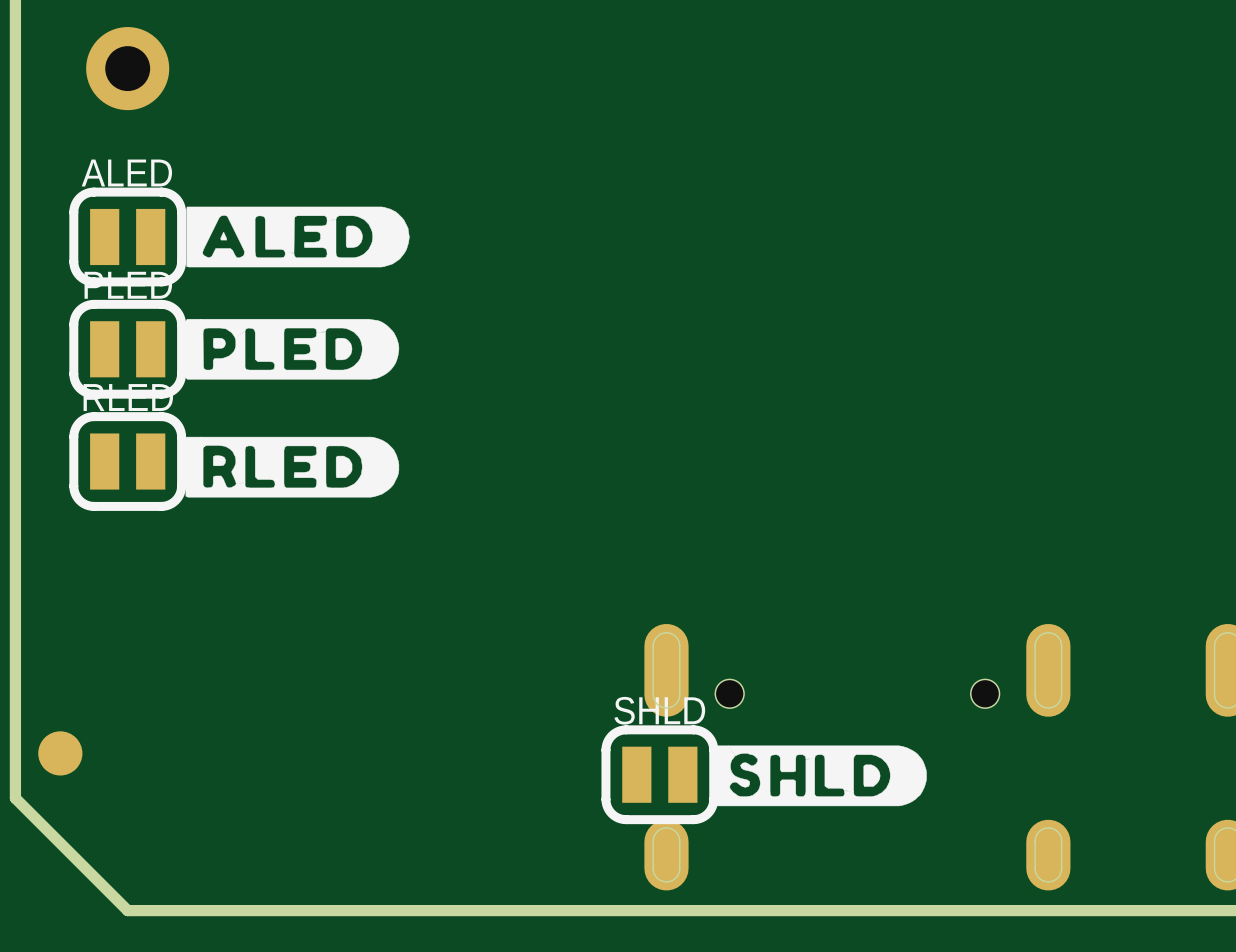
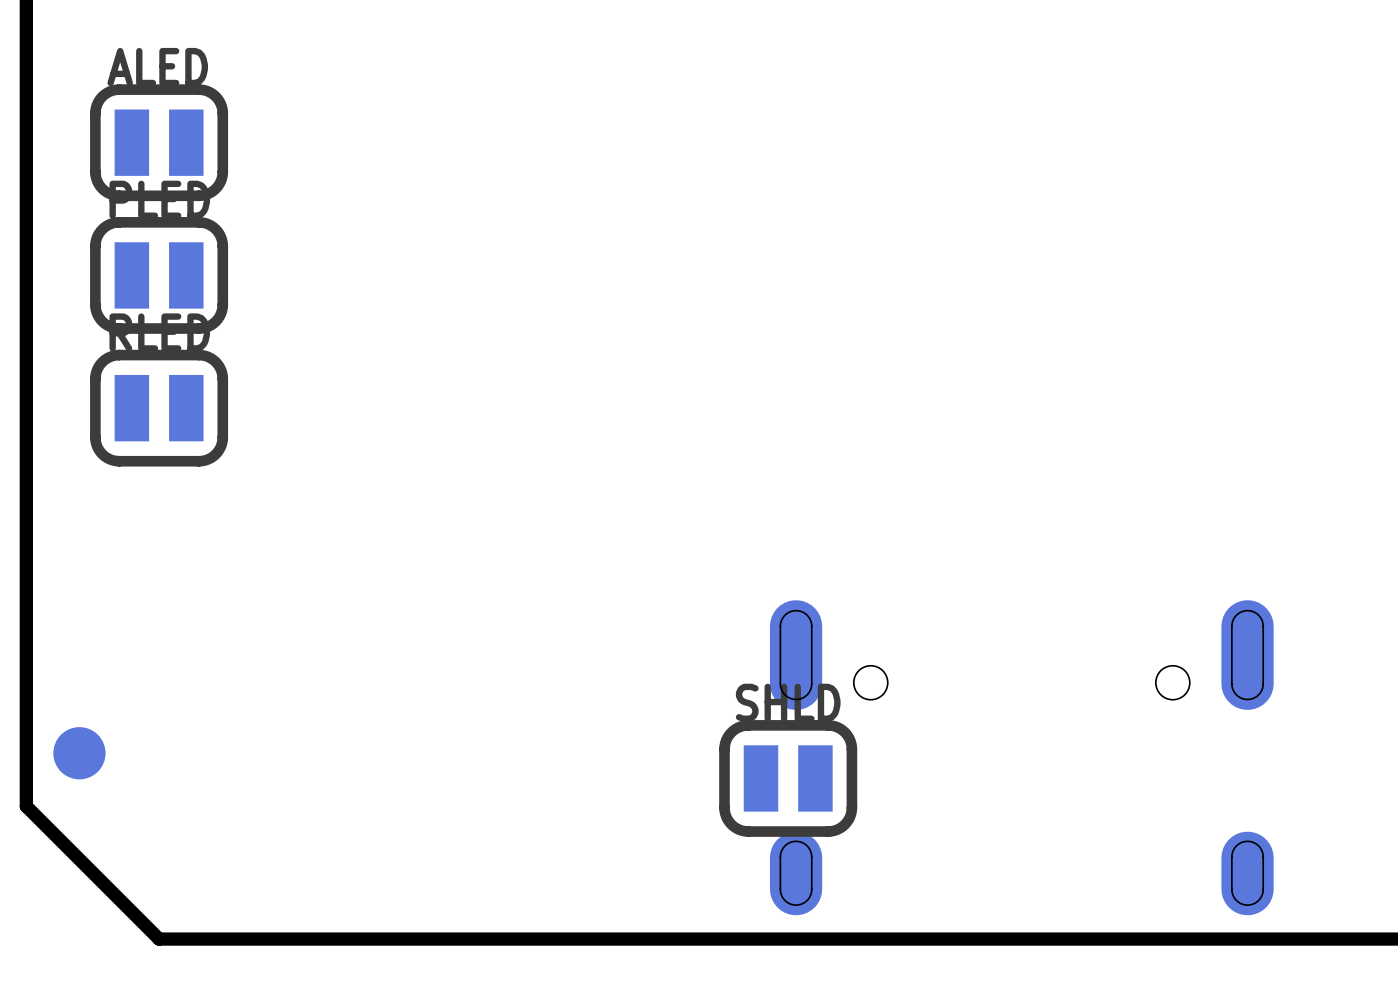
drawing: [185, 206, 410, 380] -> none
drawing: [185, 436, 400, 498] -> none
drawing: [712, 745, 927, 807] -> none

